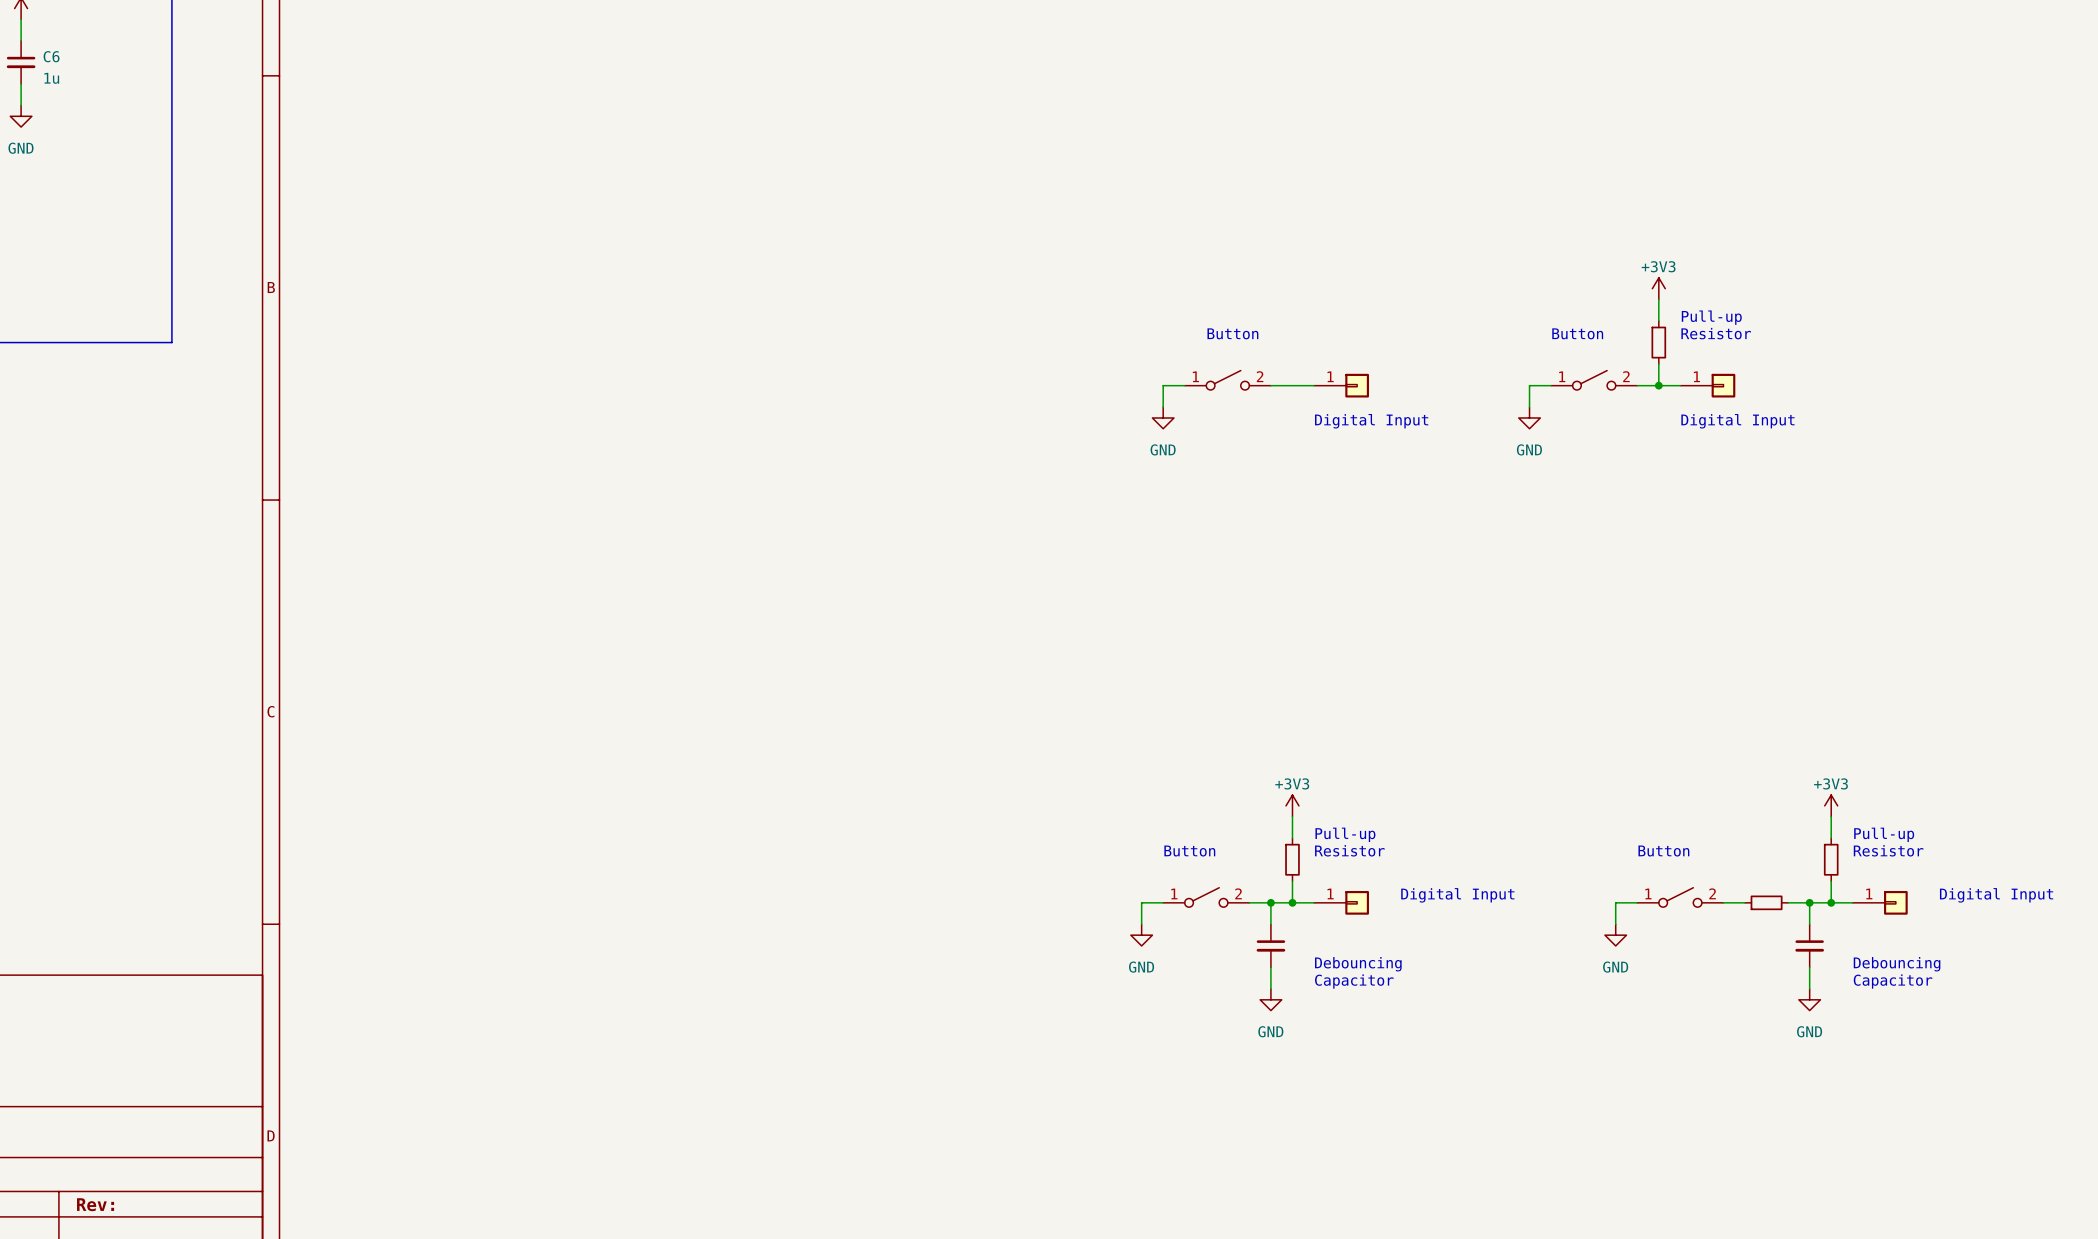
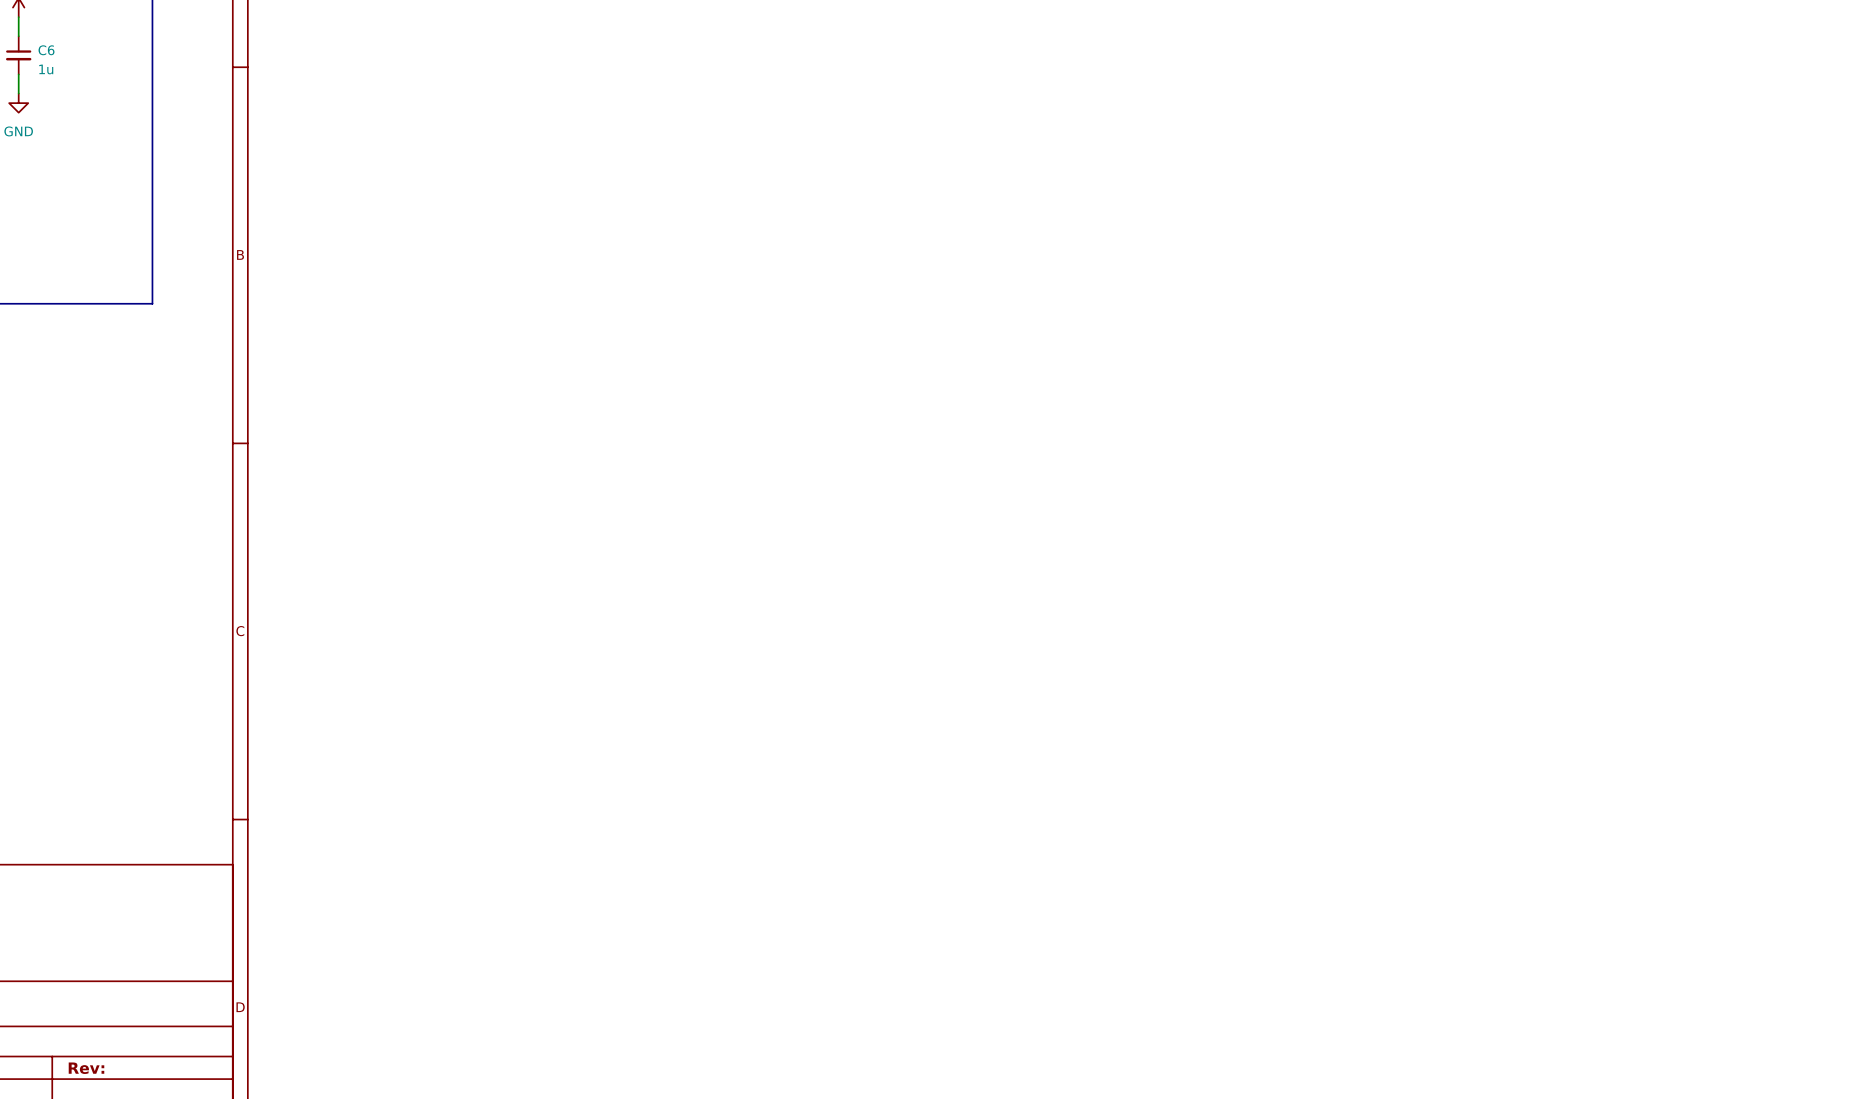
power symbol: +3V3 (1658, 288) -> none
wire: (1658, 299) (1658, 321) -> none
text: Pull-up (1711, 317) -> none
text: Button (1232, 333) -> none
text: Button (1577, 333) -> none
text: Resistor (1716, 333) -> none
part: (1658, 342) -> none
wire: (1658, 364) (1658, 385) -> none
part: (1227, 380) -> none
part: (1594, 380) -> none
wire: (1184, 385) (1163, 385) (1163, 407) -> none
wire: (1270, 385) (1314, 385) -> none
part: (1341, 385) -> none
wire: (1551, 385) (1529, 385) (1529, 407) -> none
wire: (1637, 385) (1680, 385) -> none
junction: (1658, 385) -> none
part: (1707, 385) -> none
power symbol: GND (1163, 417) -> none
power symbol: GND (1529, 417) -> none
text: Digital Input (1371, 421) -> none
text: Digital Input (1737, 421) -> none
power symbol: +3V3 (1292, 805) -> none
power symbol: +3V3 (1831, 805) -> none
wire: (1292, 816) (1292, 838) -> none
wire: (1831, 816) (1831, 838) -> none
text: Pull-up (1345, 834) -> none
text: Pull-up (1884, 834) -> none
text: Resistor (1349, 850) -> none
text: Resistor (1888, 850) -> none
text: Button (1189, 851) -> none
text: Button (1663, 851) -> none
part: (1292, 859) -> none
part: (1831, 859) -> none
wire: (1292, 881) (1292, 902) -> none
wire: (1831, 881) (1831, 902) -> none
text: Digital Input (1457, 895) -> none
text: Digital Input (1996, 895) -> none
part: (1206, 897) -> none
part: (1680, 897) -> none
wire: (1163, 902) (1141, 902) (1141, 924) -> none
wire: (1249, 902) (1314, 902) -> none
wire: (1270, 902) (1270, 924) -> none
junction: (1270, 902) -> none
junction: (1292, 902) -> none
part: (1341, 902) -> none
wire: (1637, 902) (1615, 902) (1615, 924) -> none
wire: (1723, 902) (1745, 902) -> none
part: (1766, 902) -> none
wire: (1788, 902) (1852, 902) -> none
wire: (1809, 902) (1809, 924) -> none
junction: (1809, 902) -> none
junction: (1831, 902) -> none
part: (1880, 902) -> none
power symbol: GND (1141, 935) -> none
power symbol: GND (1615, 935) -> none
part: (1270, 945) -> none
part: (1809, 945) -> none
text: Debouncing (1358, 964) -> none
text: Debouncing (1897, 964) -> none
wire: (1270, 967) (1270, 989) -> none
wire: (1809, 967) (1809, 989) -> none
text: Capacitor (1354, 981) -> none
text: Capacitor (1893, 981) -> none
power symbol: GND (1270, 999) -> none
power symbol: GND (1809, 999) -> none

